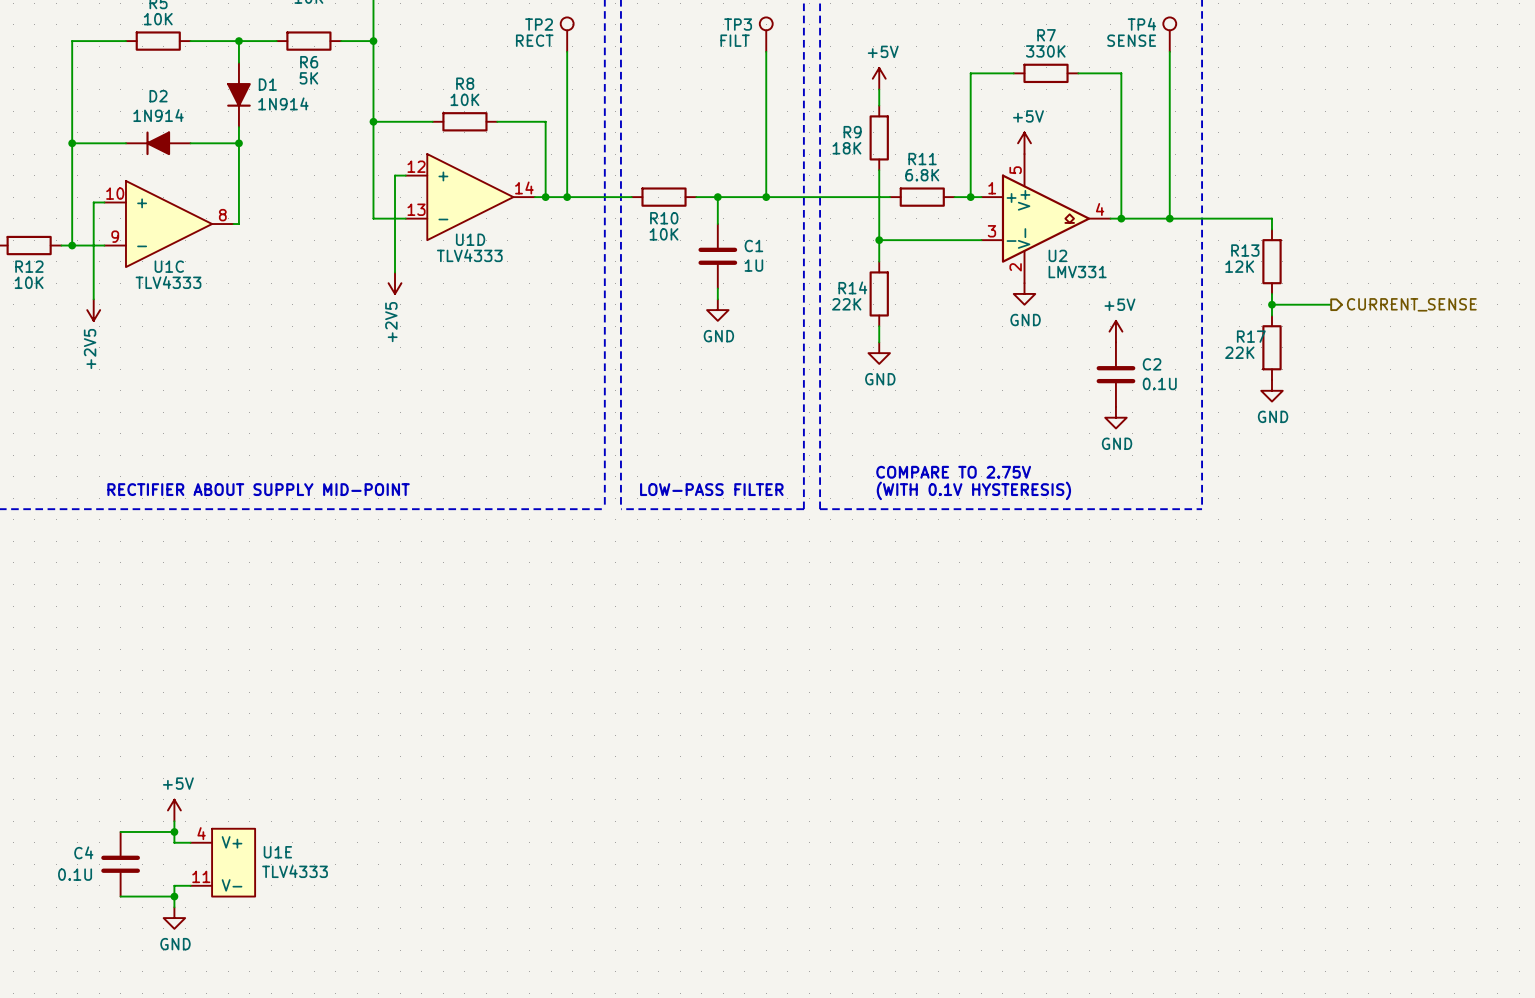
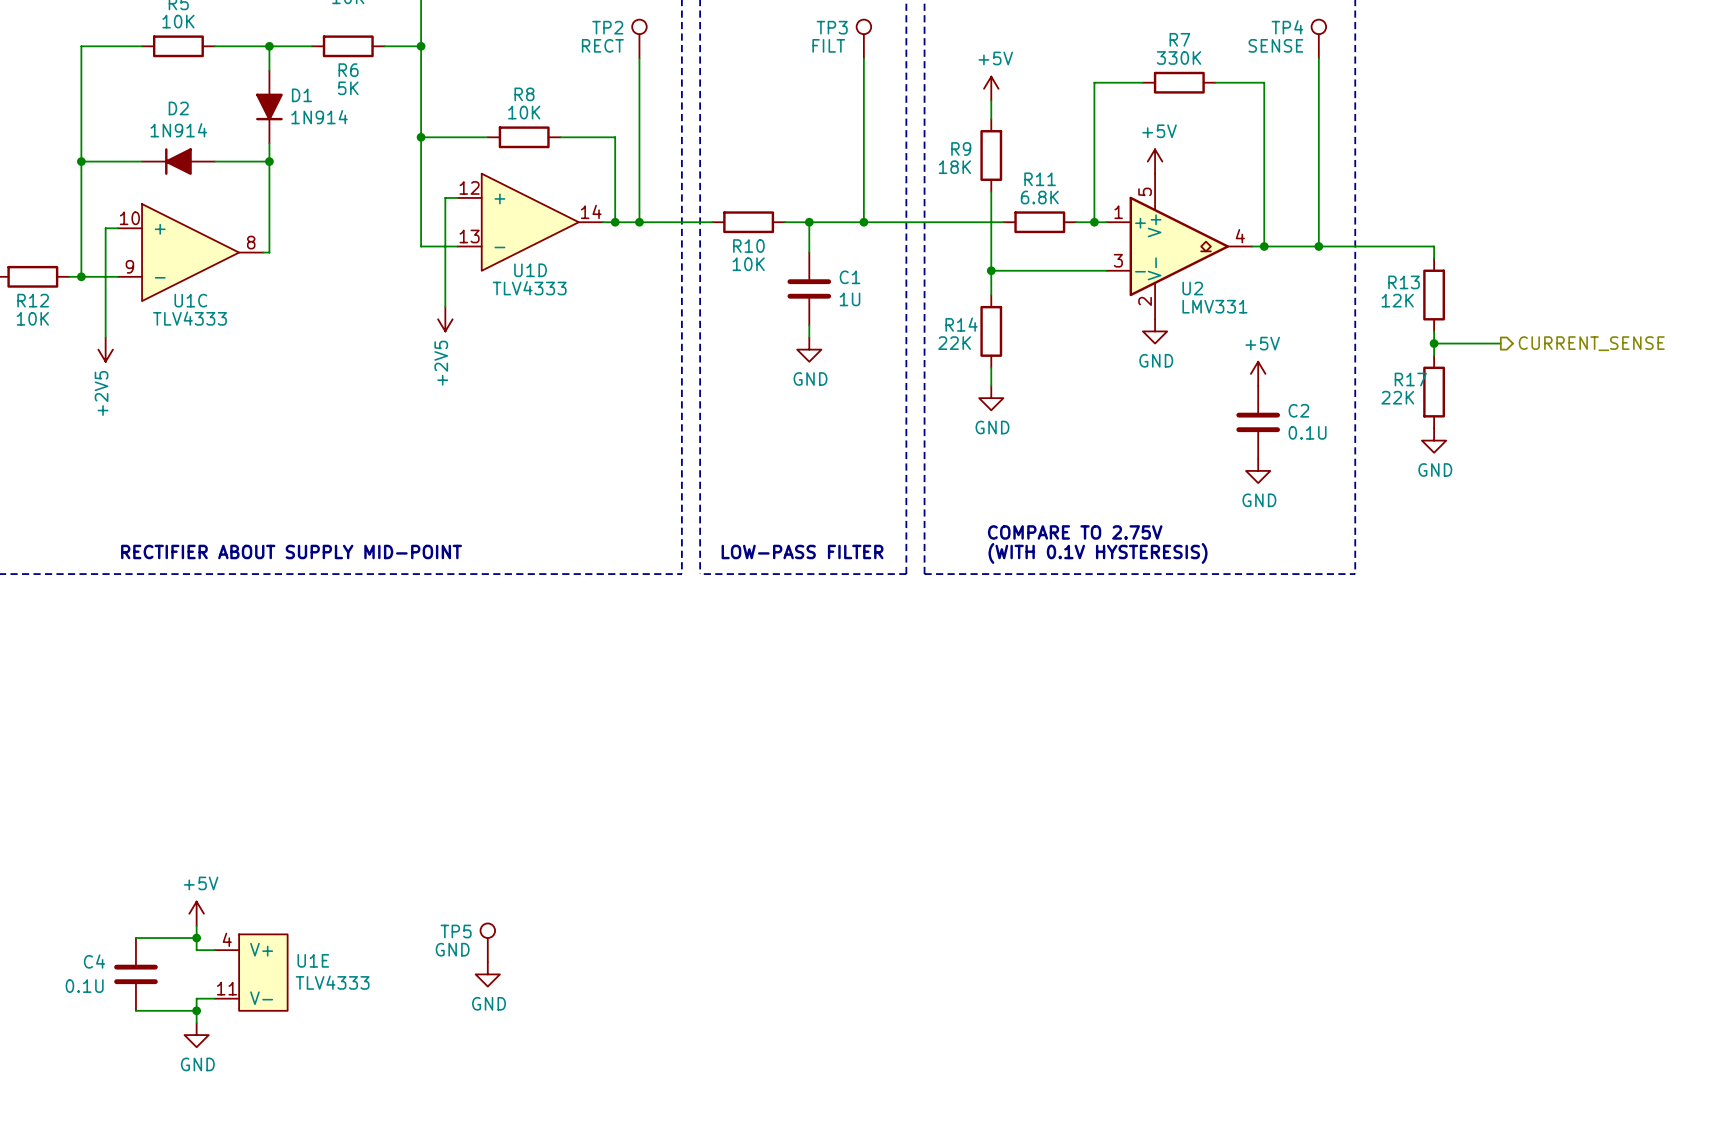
TP5: none -> GND (487, 942)
power symbol: none -> GND (487, 974)

